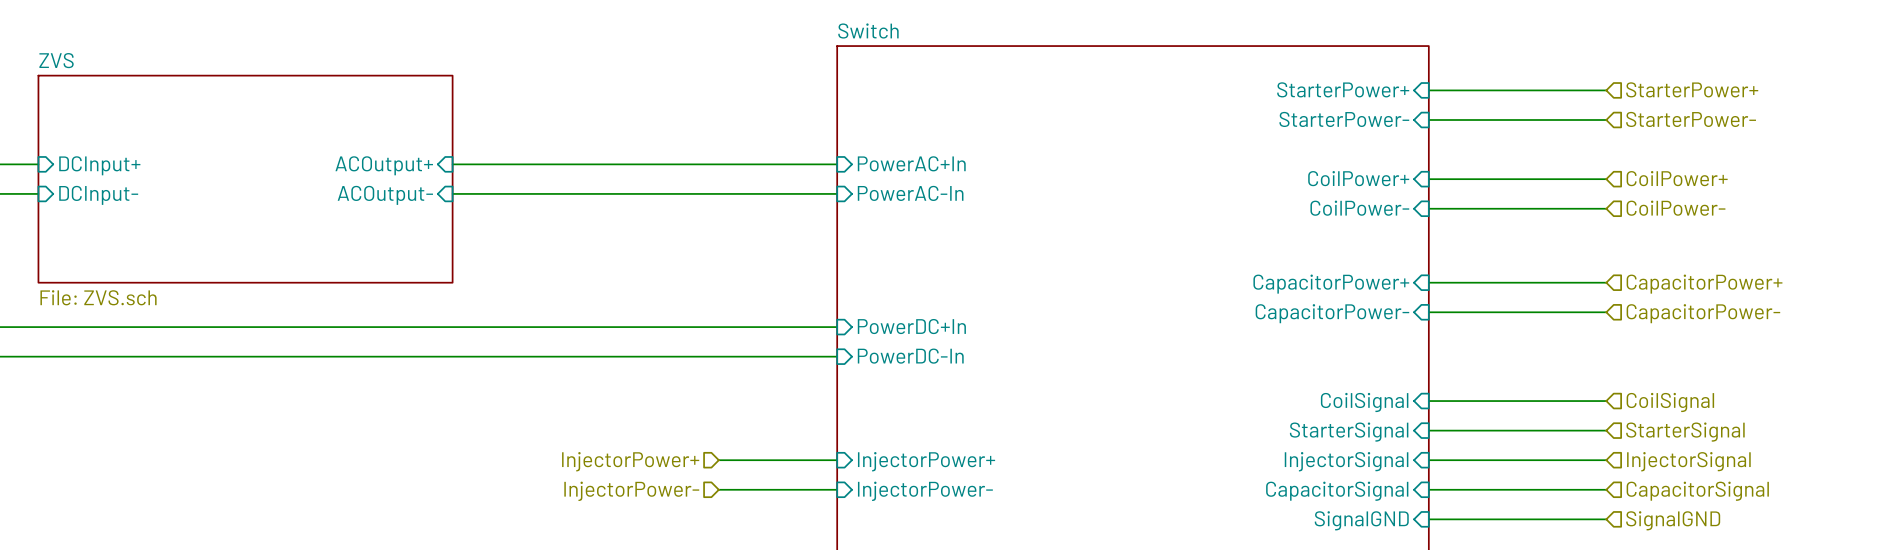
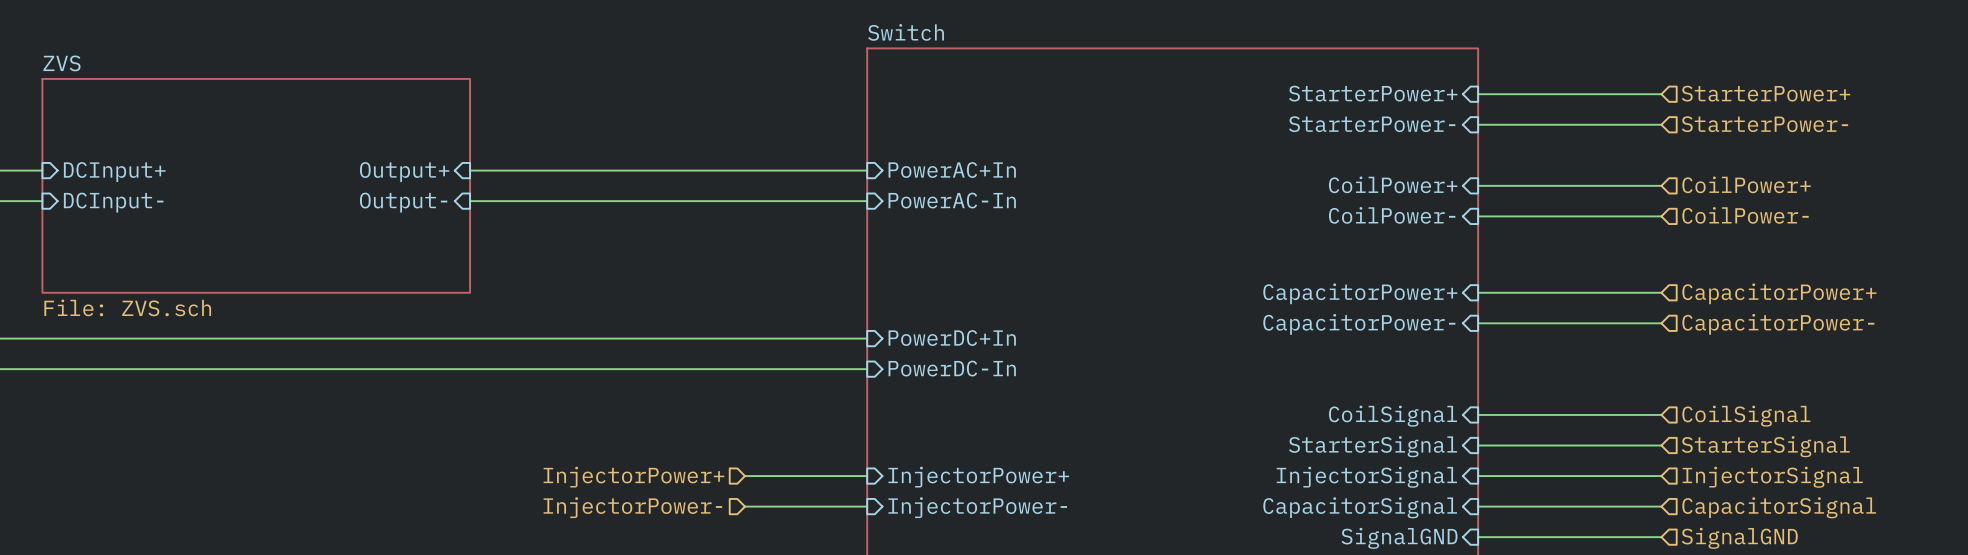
sheet pin: ACOutput+ (384, 165) -> Output+ (404, 172)
sheet pin: ACOutput- (385, 195) -> Output- (403, 202)

